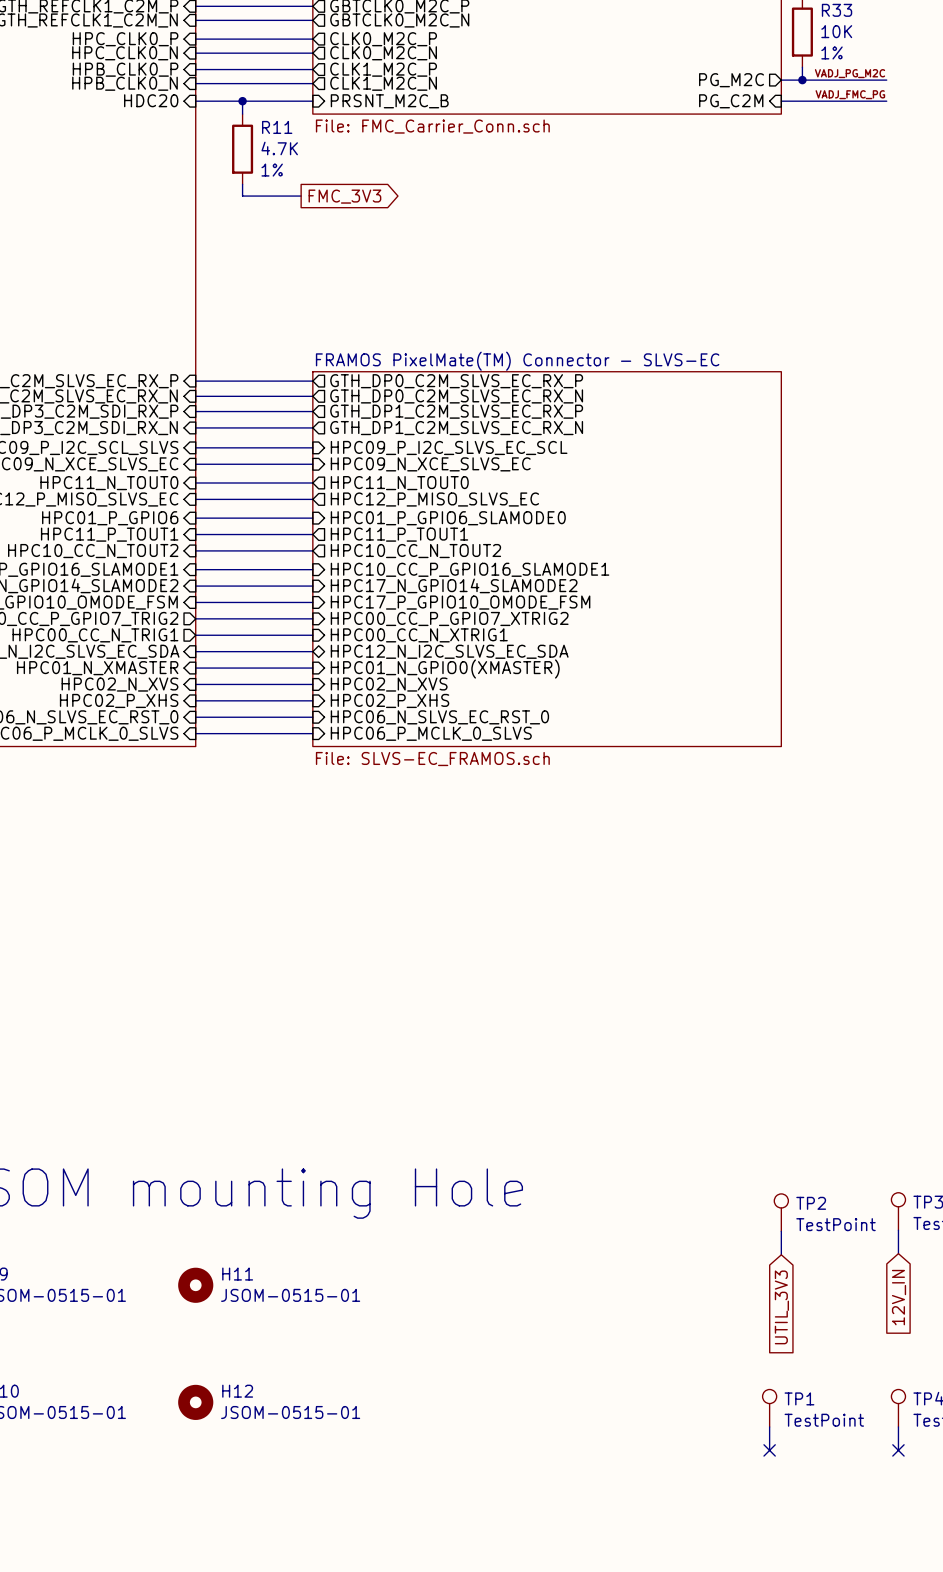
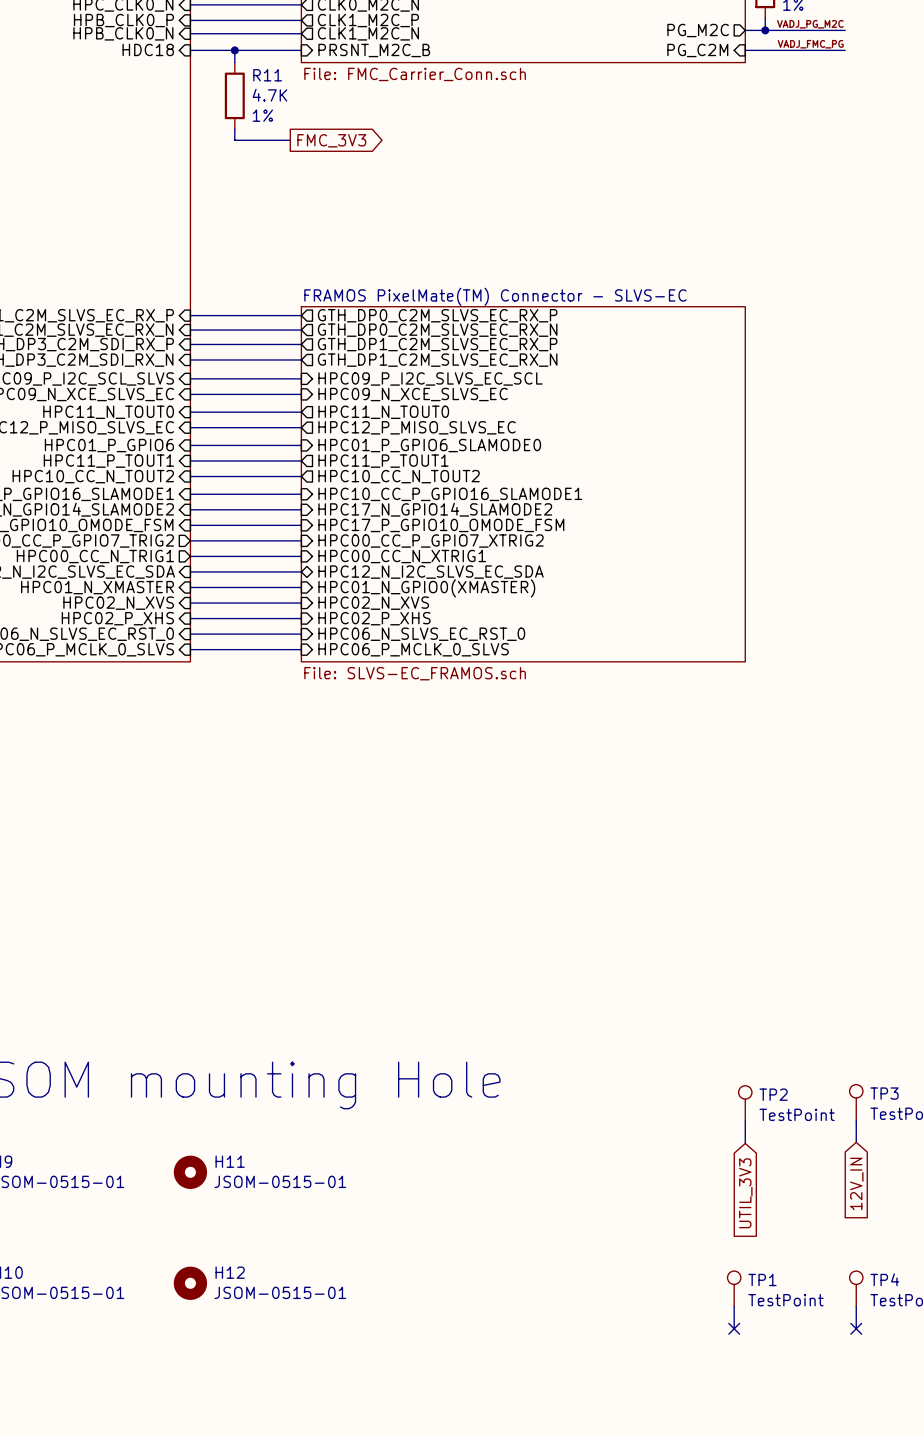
sheet pin: HDC20 (151, 100) -> HDC18 (148, 49)

